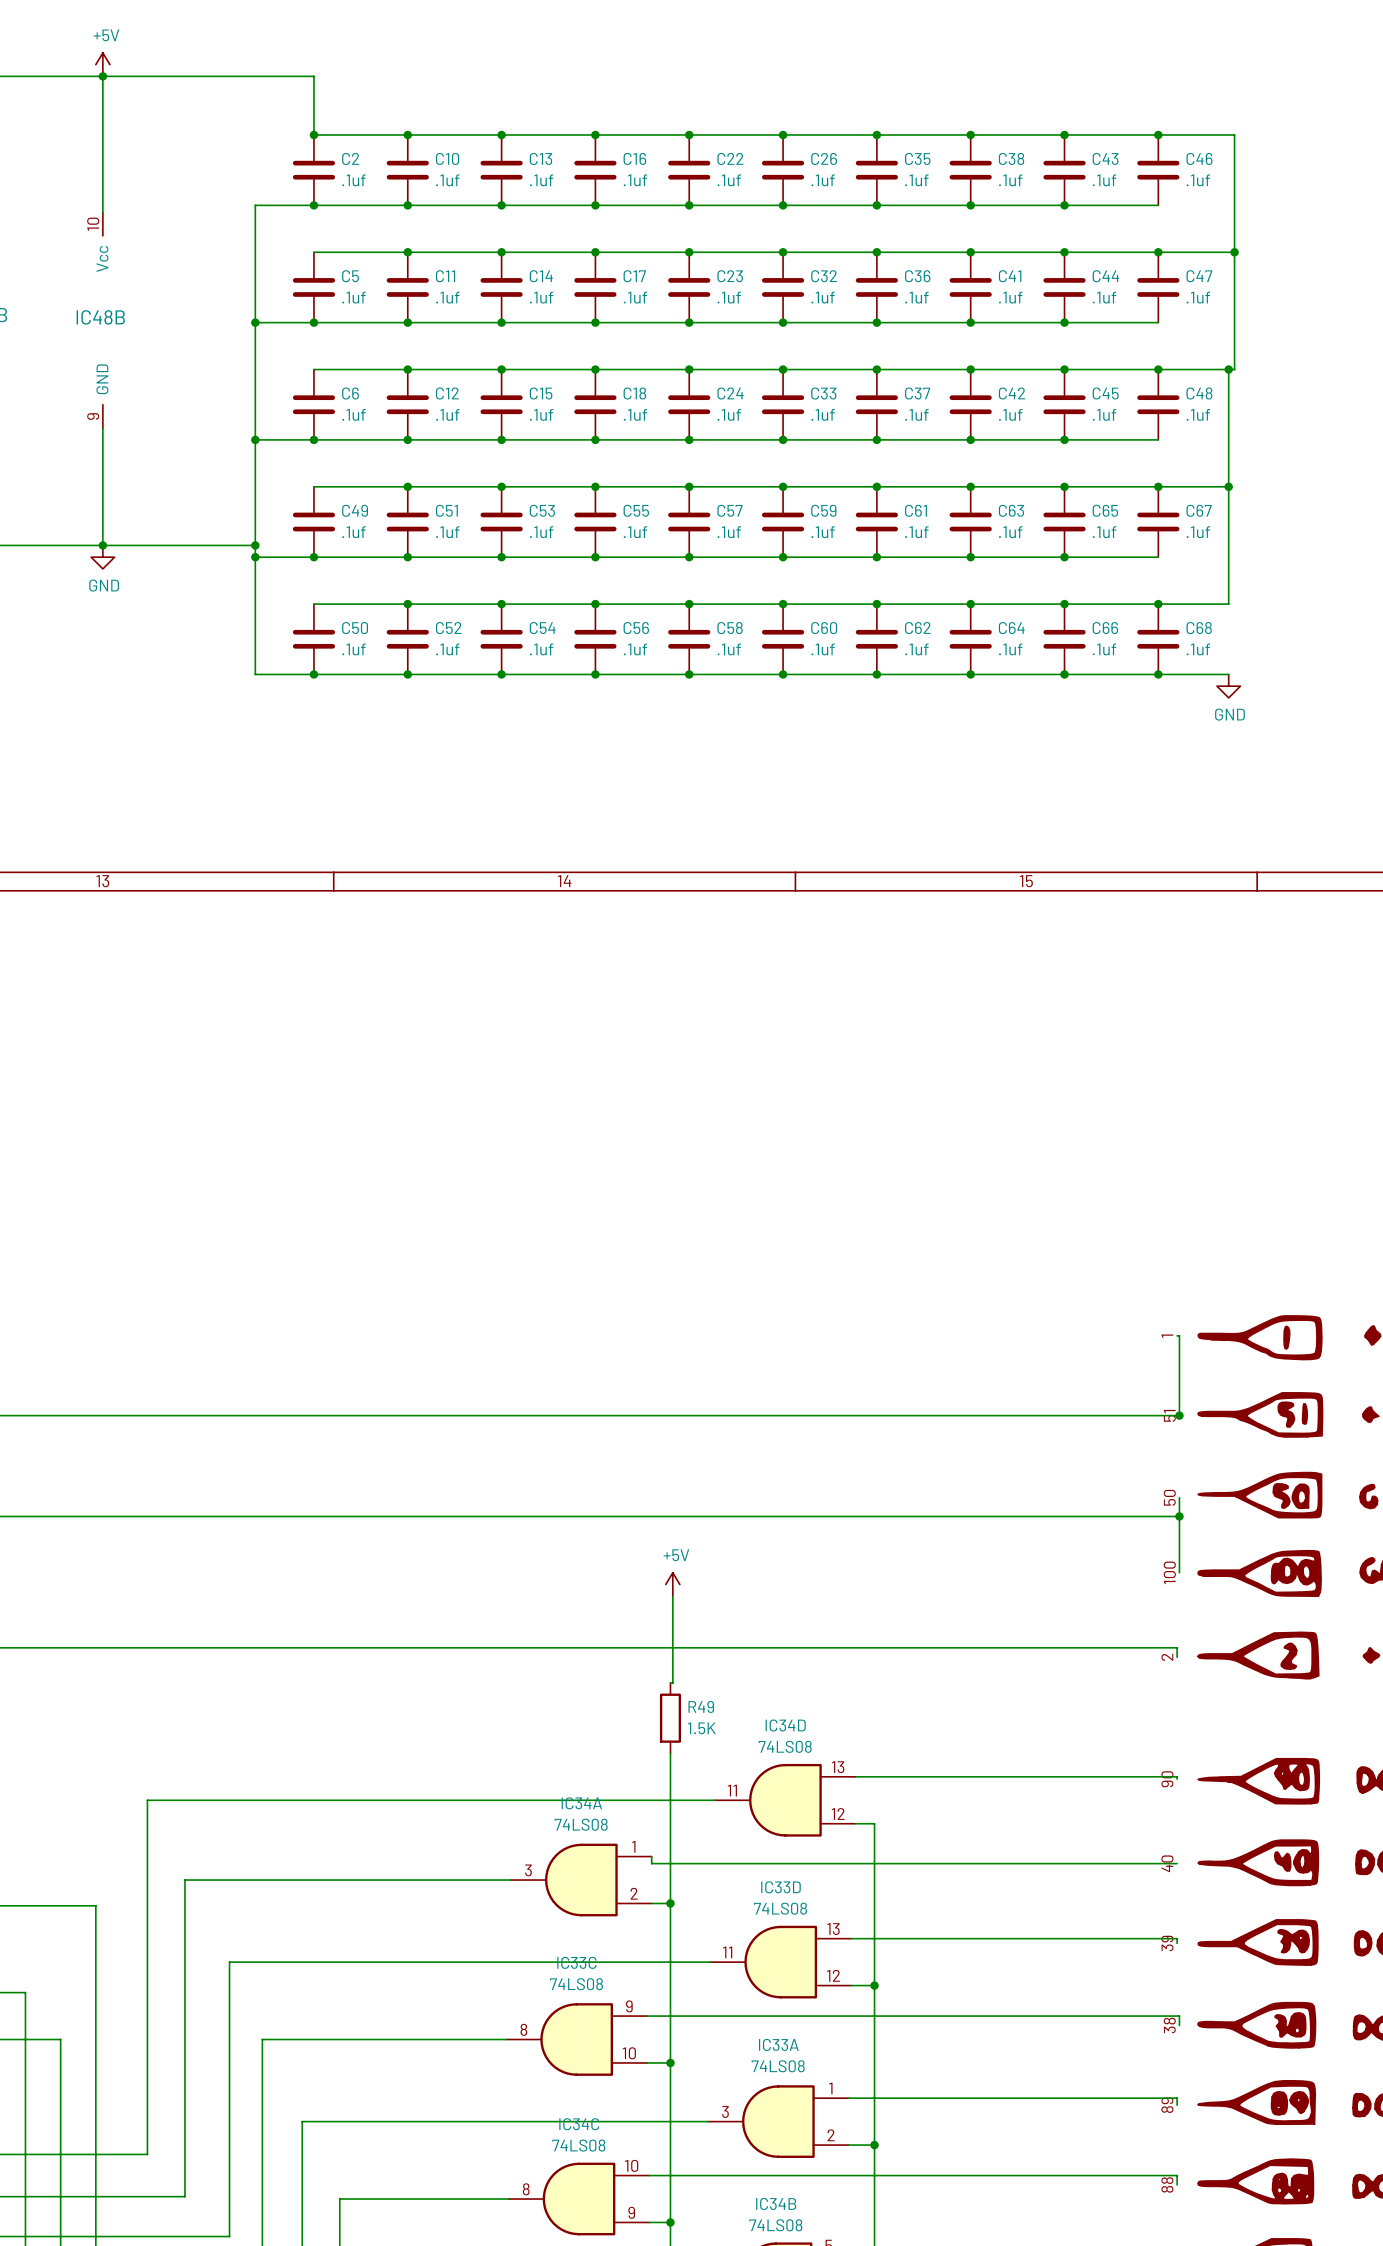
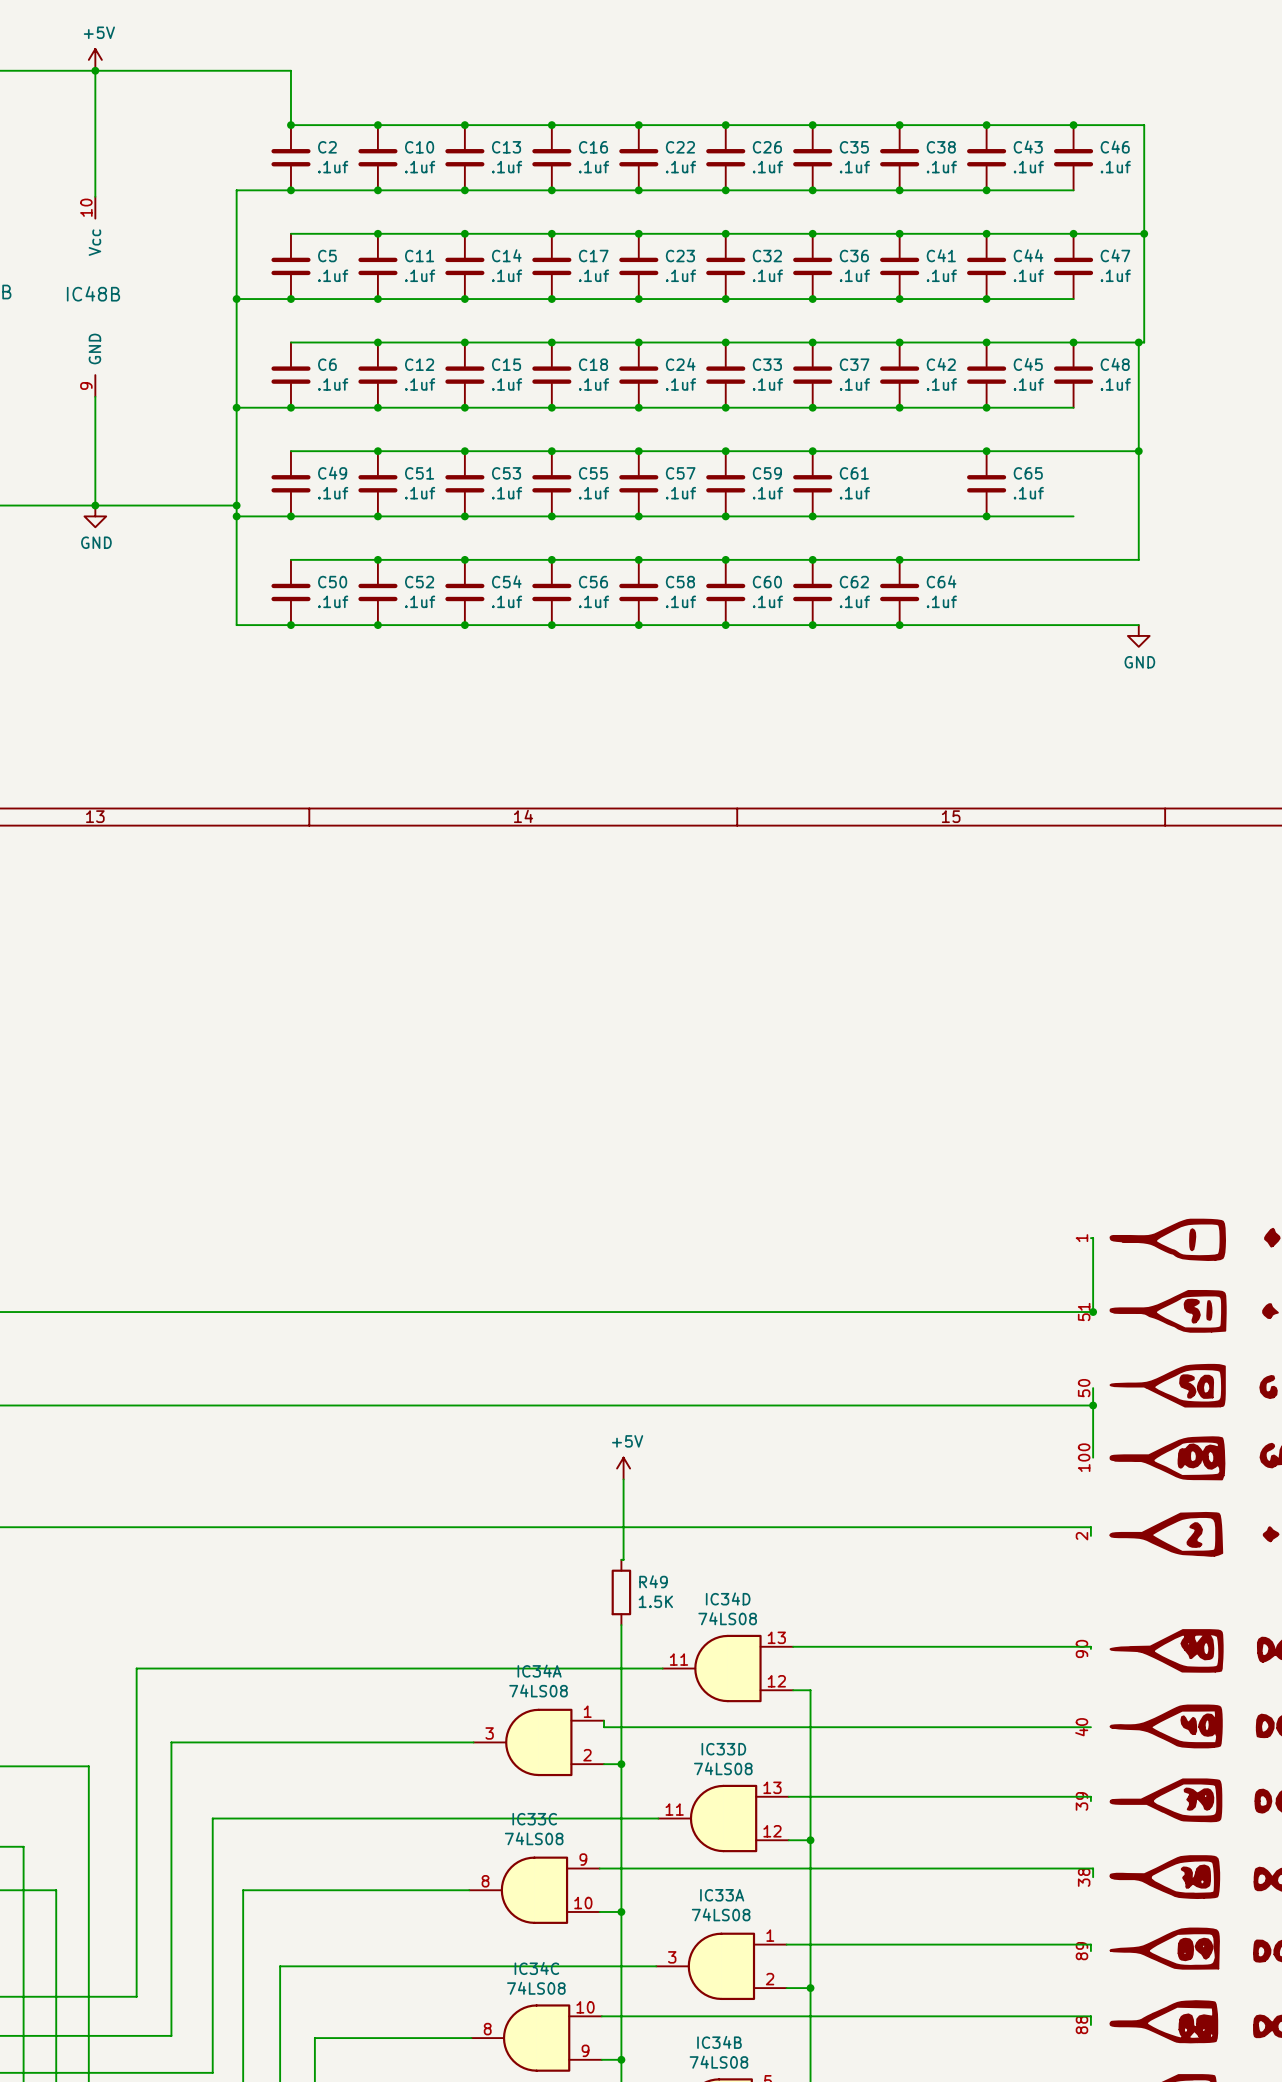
junction: (970, 486) -> none
junction: (1158, 486) -> none
C63: .1uf (970, 522) -> none
C67: .1uf (1158, 522) -> none
junction: (970, 557) -> none
junction: (1064, 604) -> none
junction: (1158, 604) -> none
C66: .1uf (1064, 639) -> none
C68: .1uf (1158, 639) -> none
junction: (1064, 674) -> none
junction: (1158, 674) -> none

